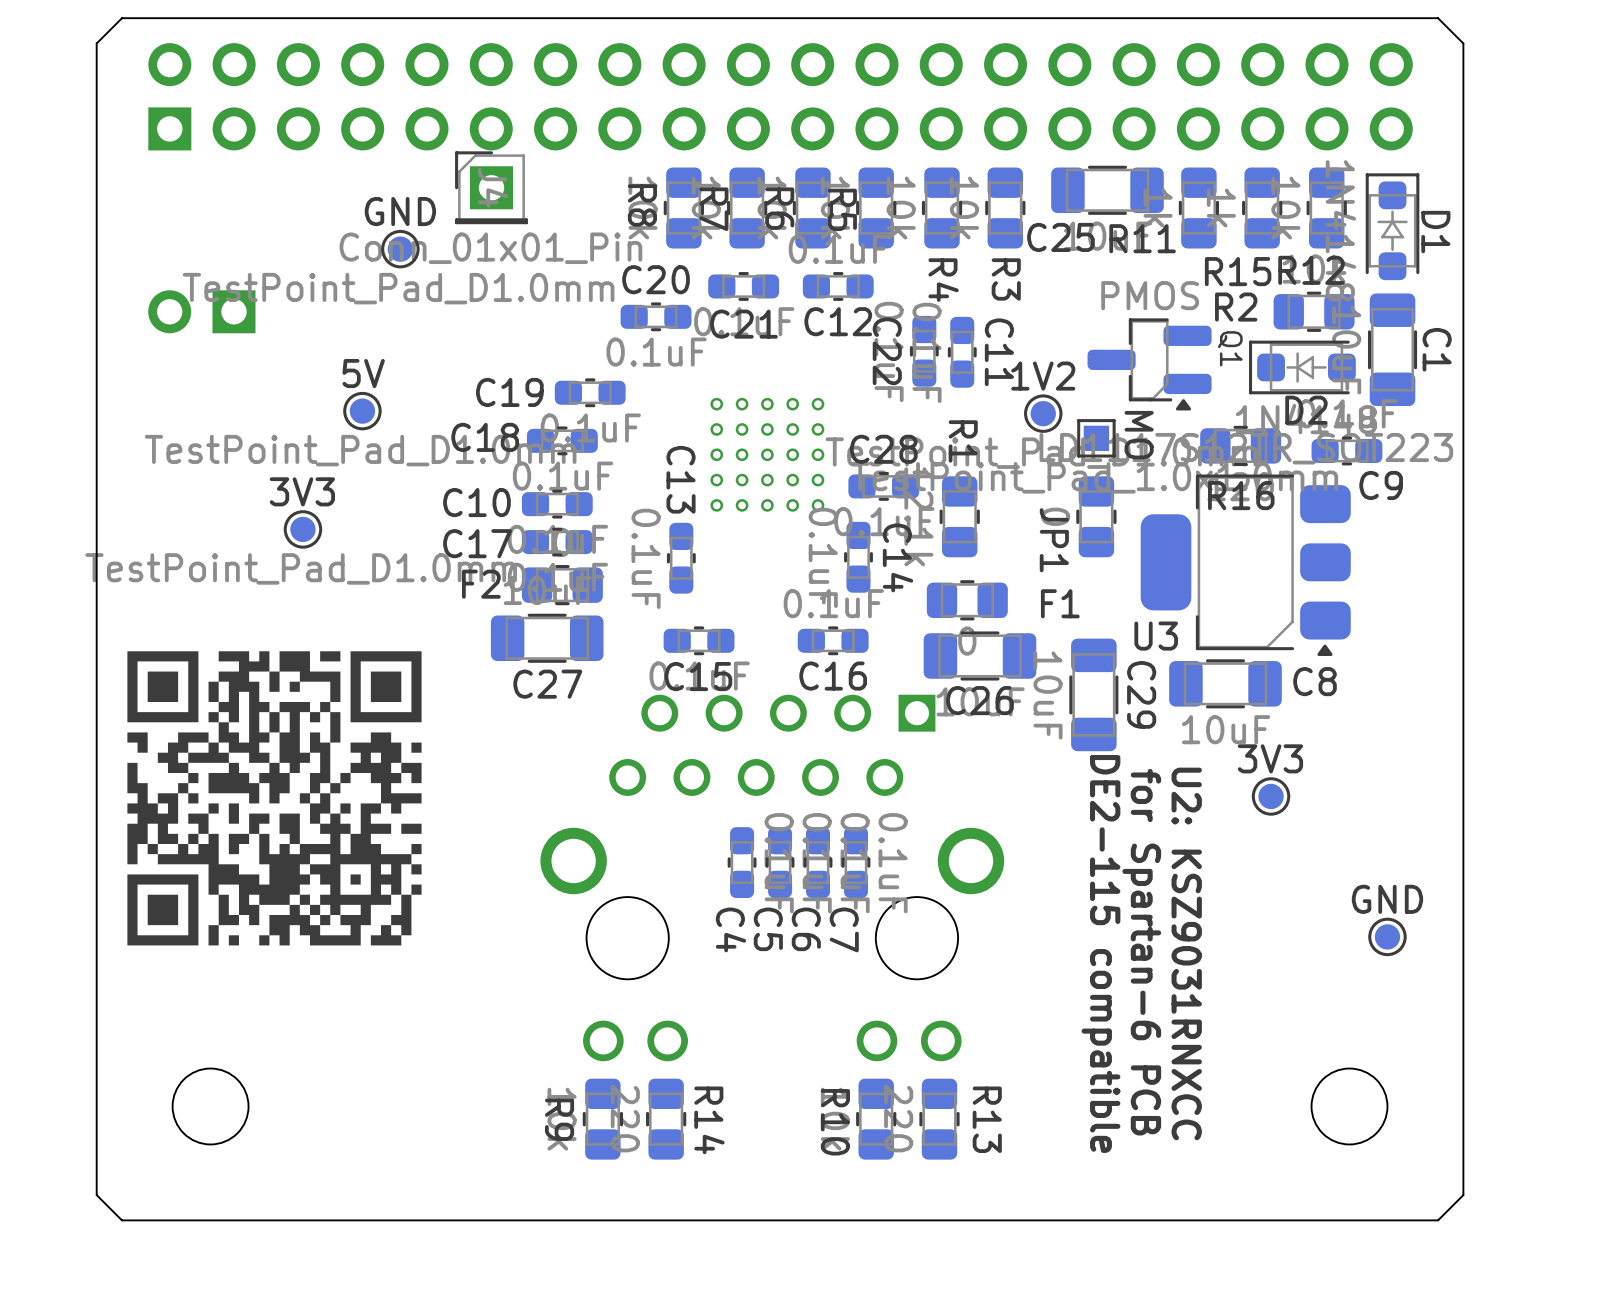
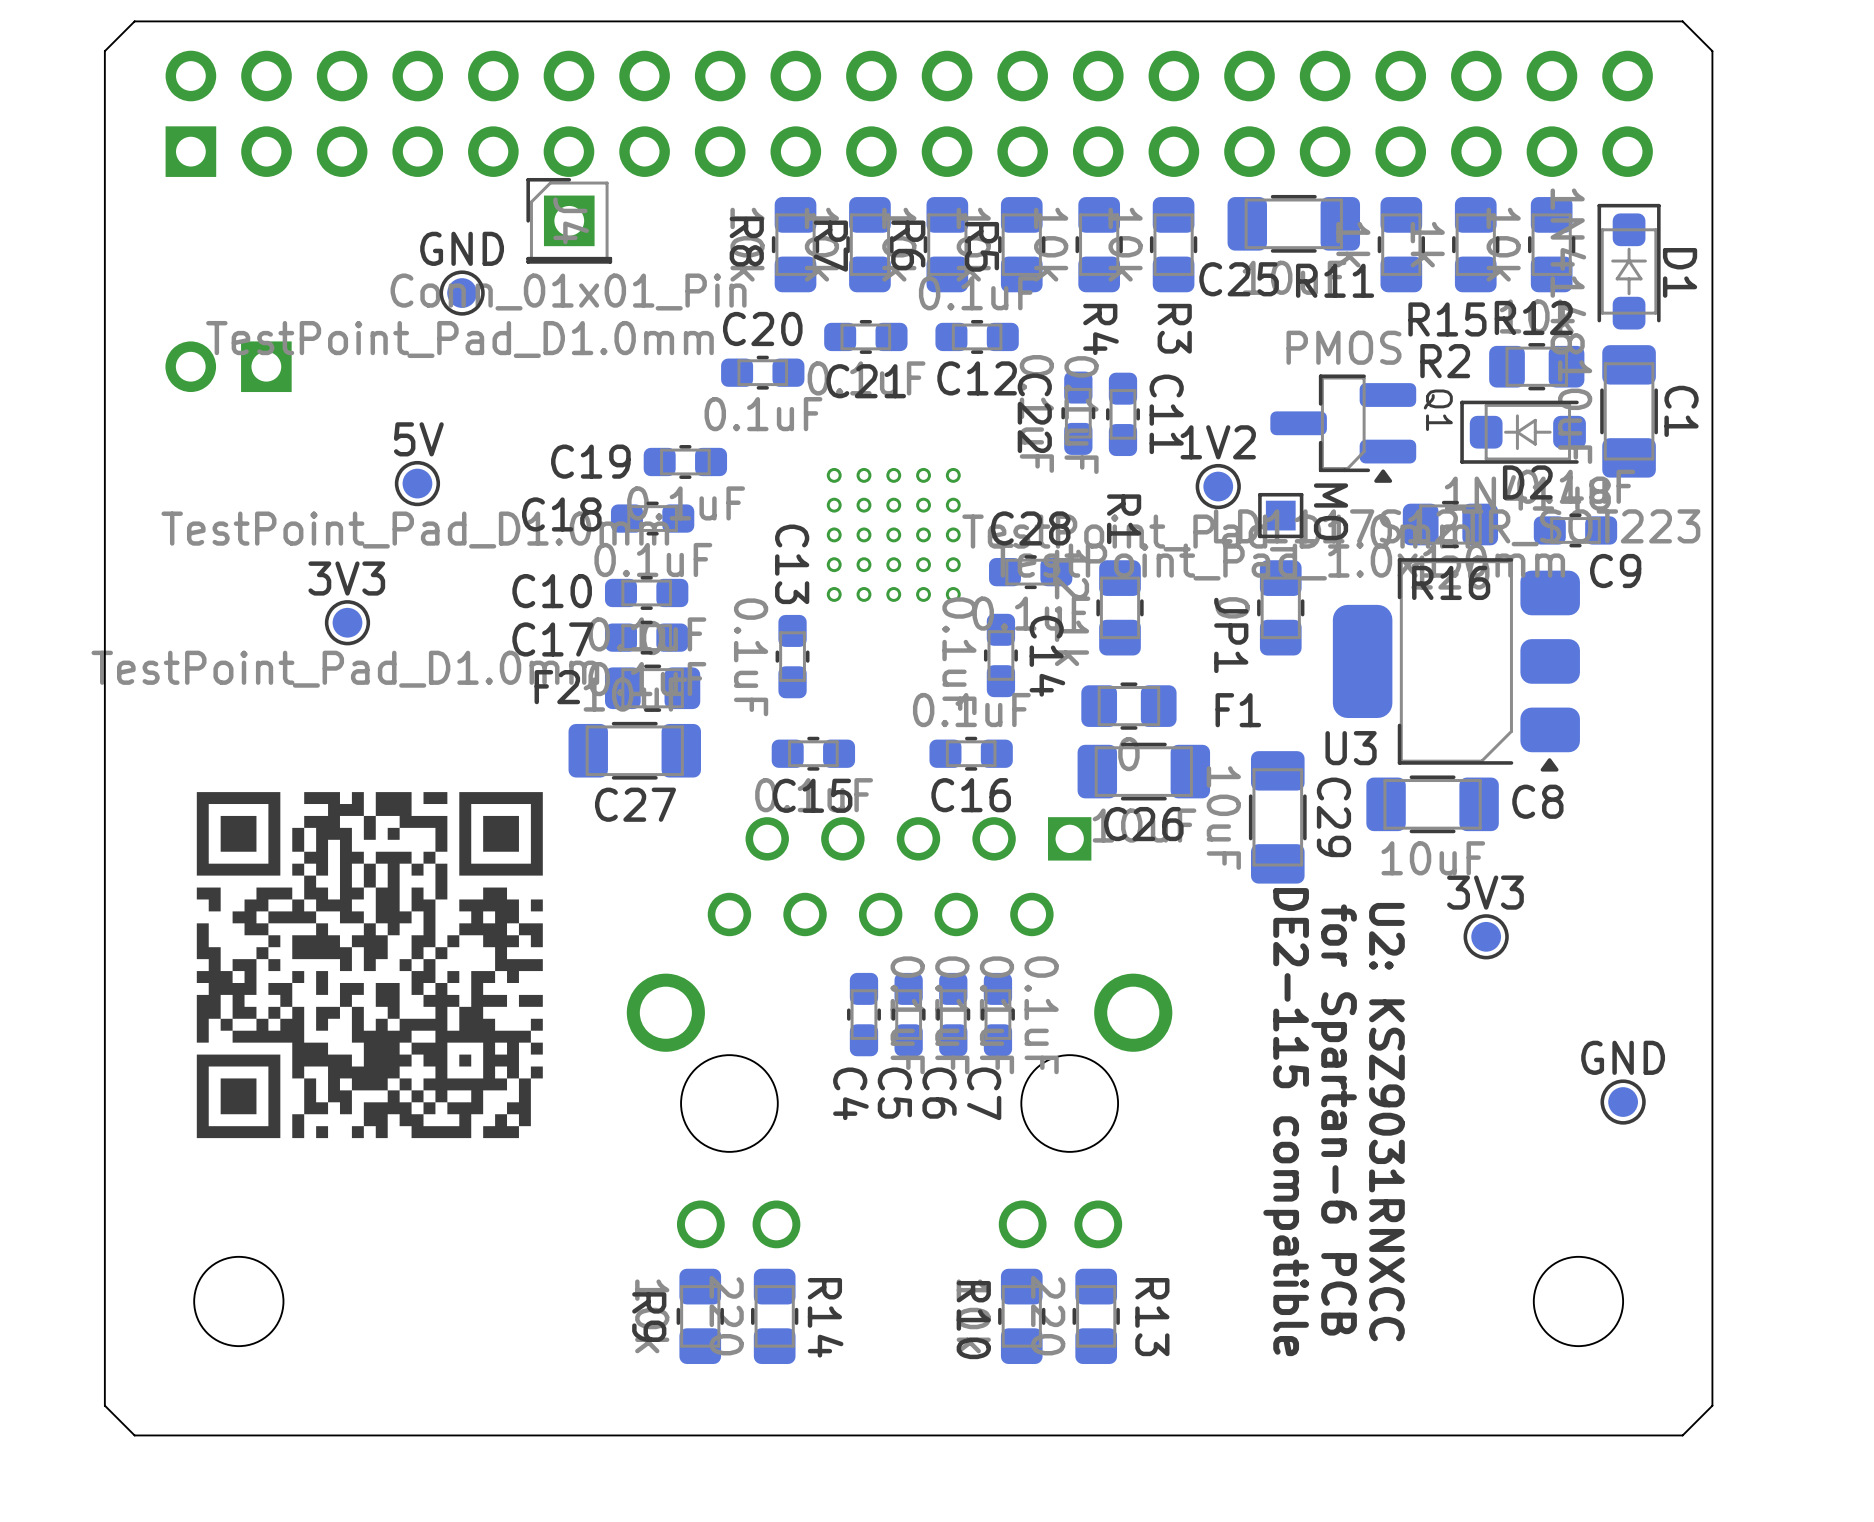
drawing position: (274, 798) -> (369, 965)

